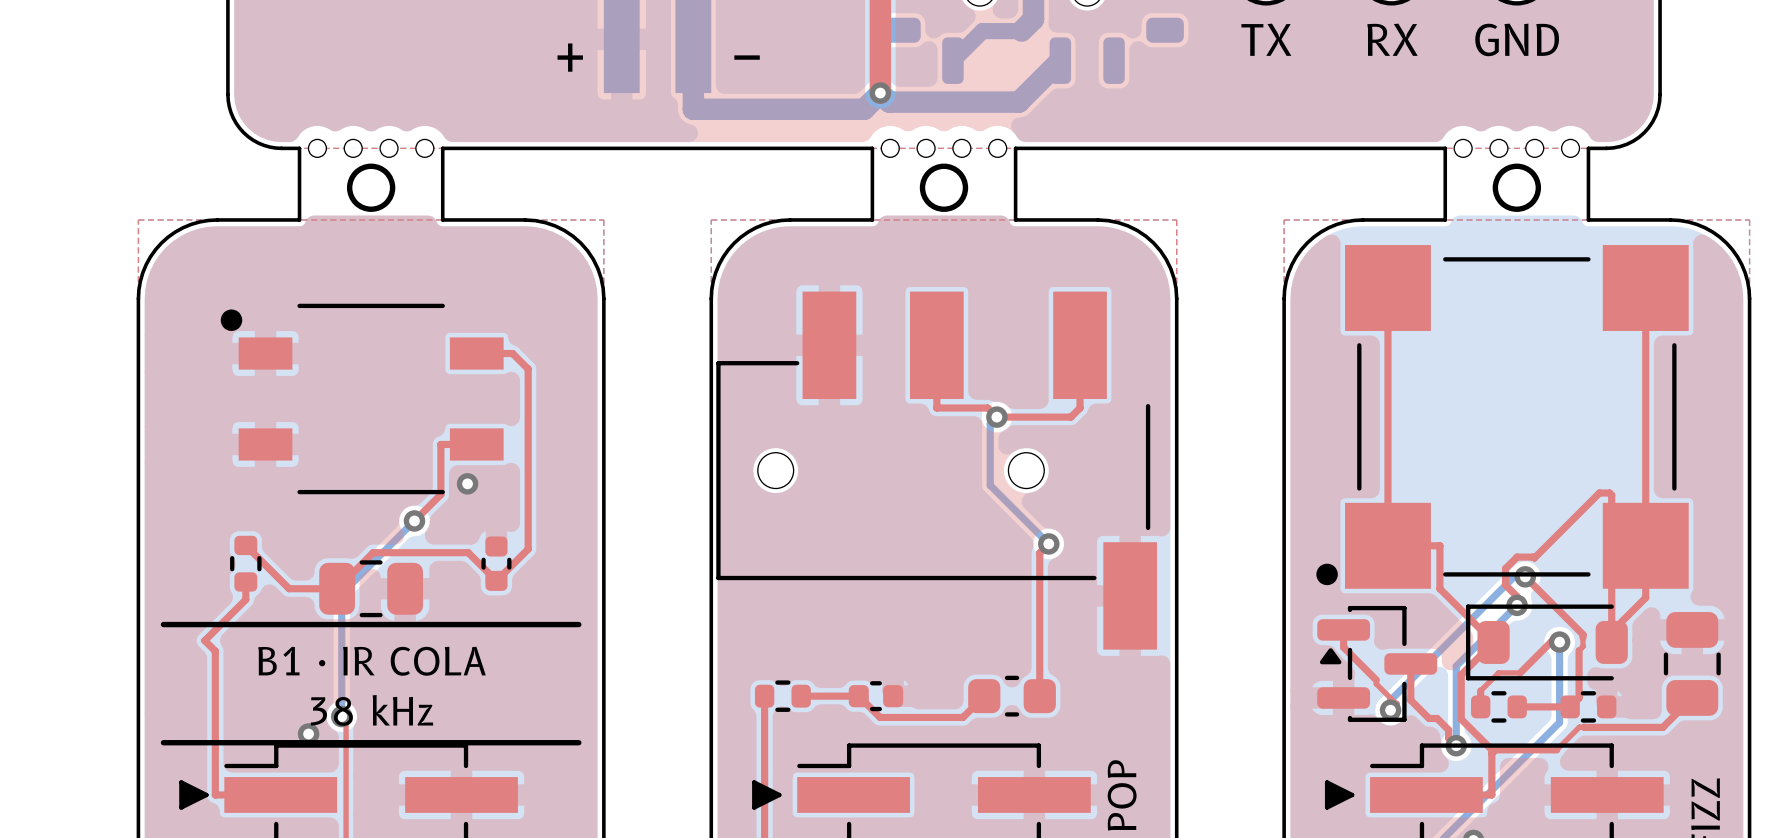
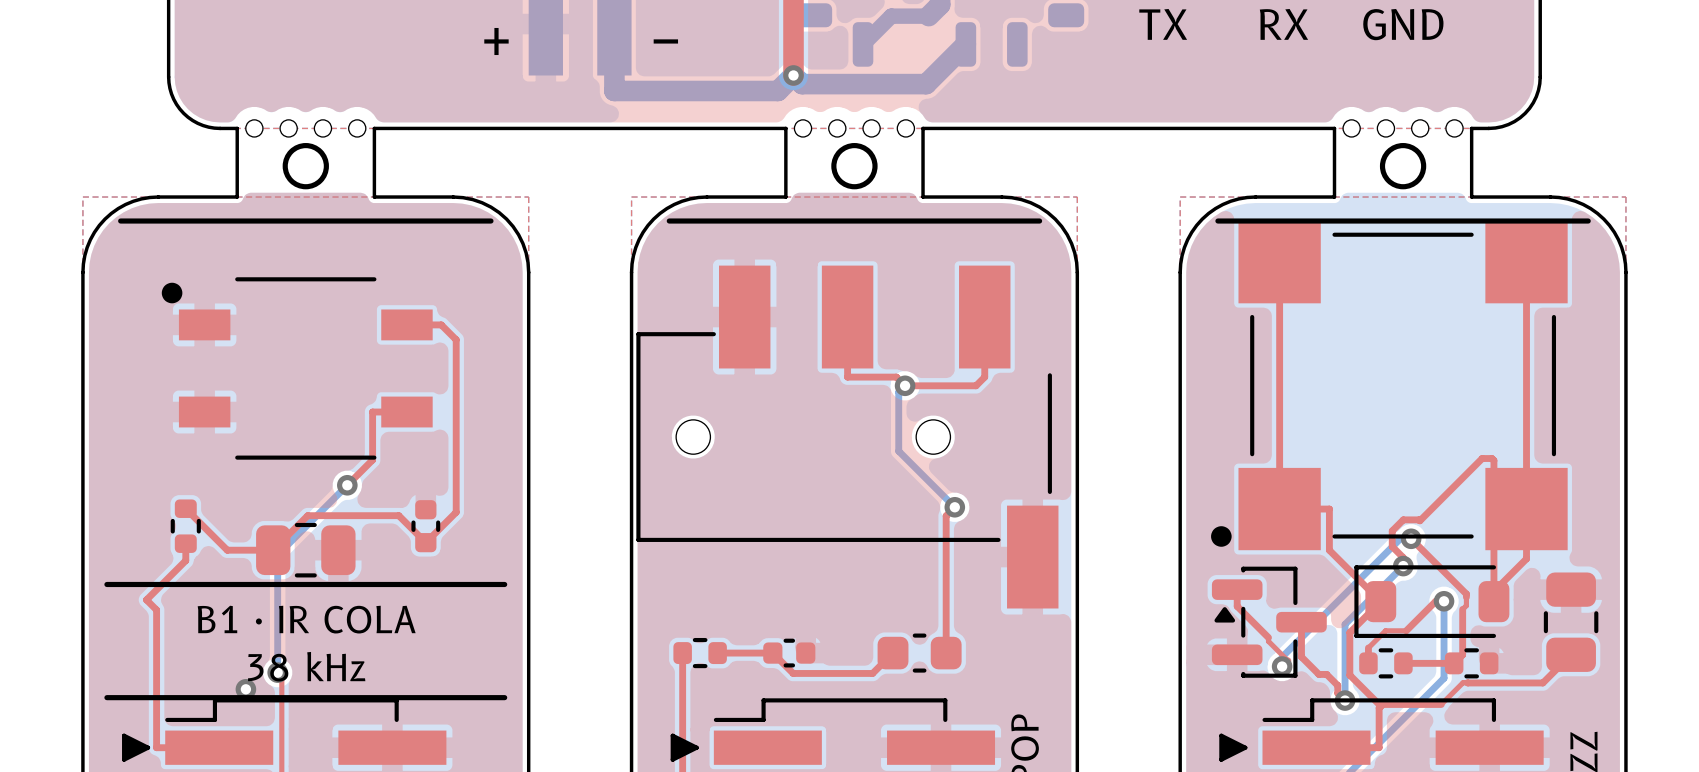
line: none -> (120, 221) (490, 221)
line: none -> (669, 221) (1039, 221)
line: none -> (1217, 221) (1588, 221)
via: (467, 483) -> none

